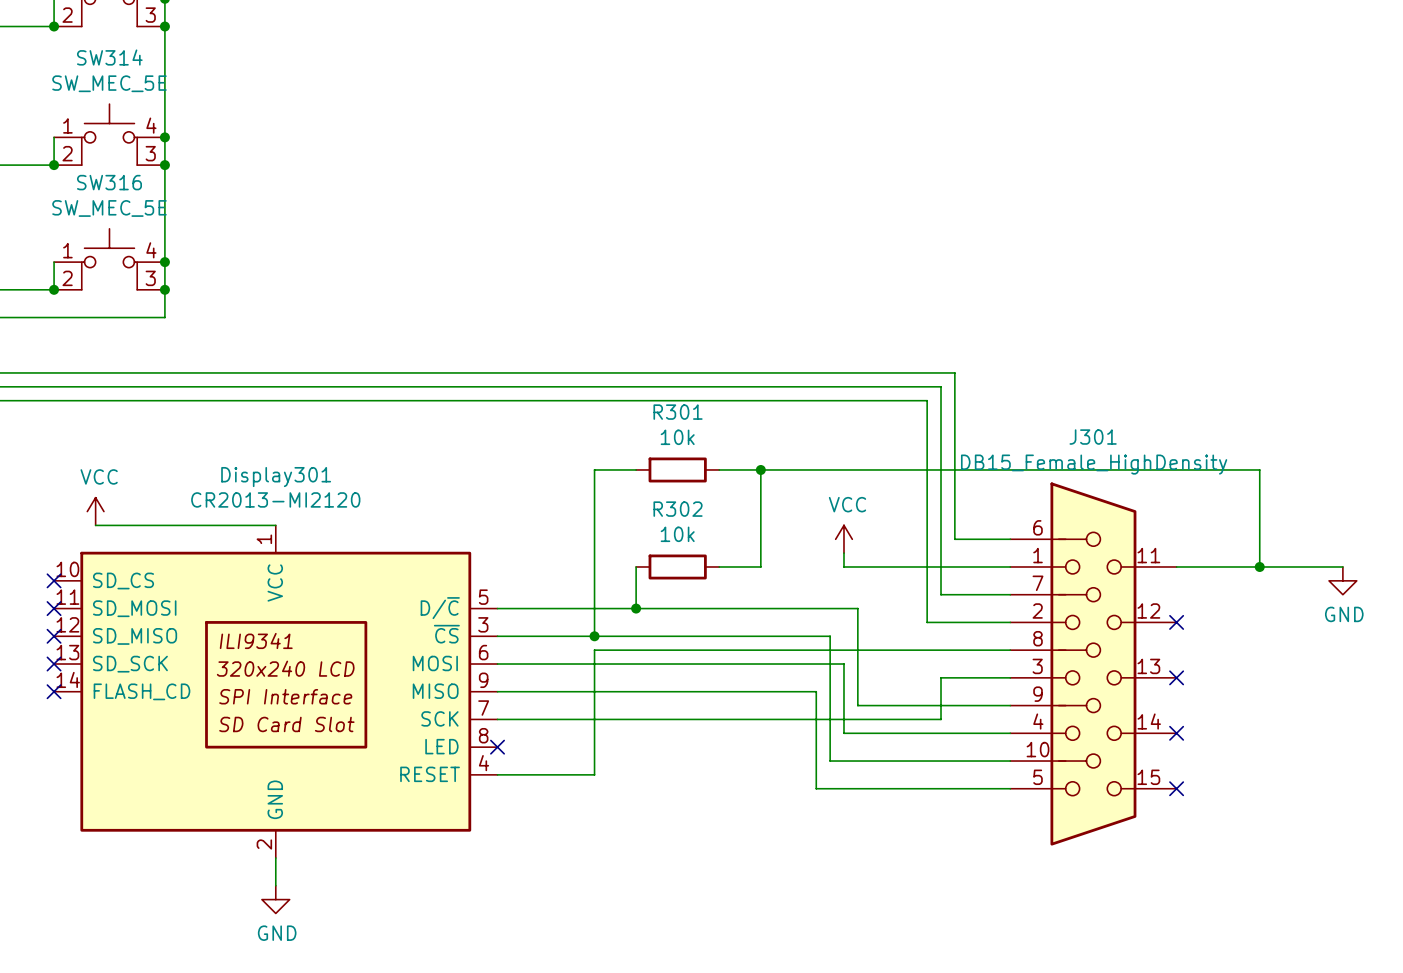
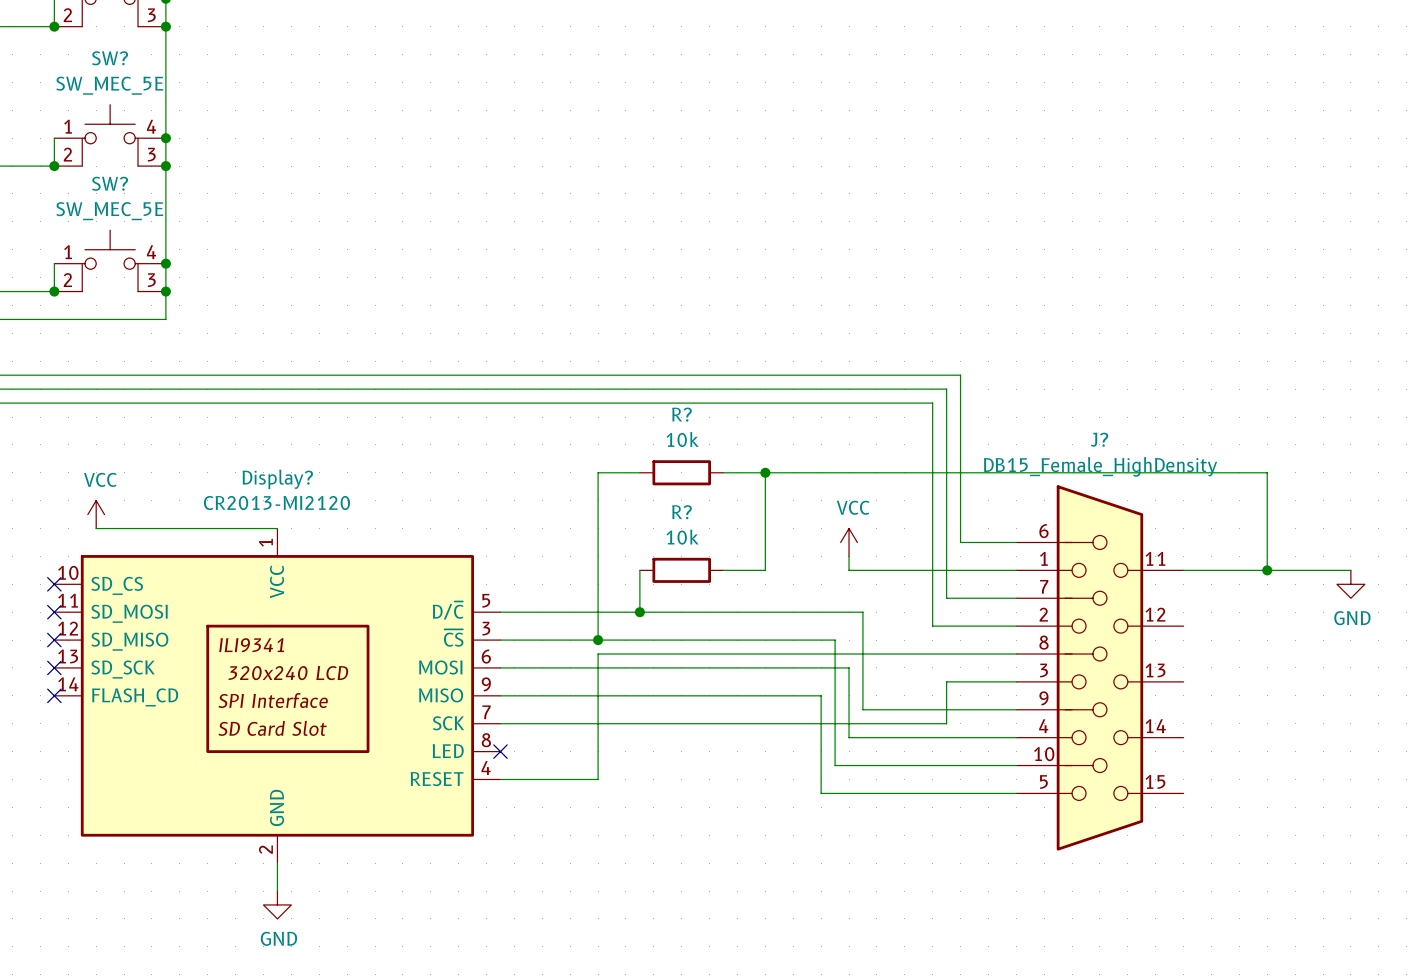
SW314 name: SW314 (109, 57) -> SW? (110, 58)
SW316 name: SW316 (109, 182) -> SW? (110, 183)
R301 name: R301 (678, 412) -> R? (681, 414)
J301 name: J301 (1093, 437) -> J? (1099, 439)
Display301 name: Display301 (276, 477) -> Display? (277, 479)
R302 name: R302 (678, 509) -> R? (681, 512)
no-connect mark: (1176, 622) -> none
no-connect mark: (1176, 677) -> none
no-connect mark: (1176, 733) -> none
no-connect mark: (1176, 788) -> none

